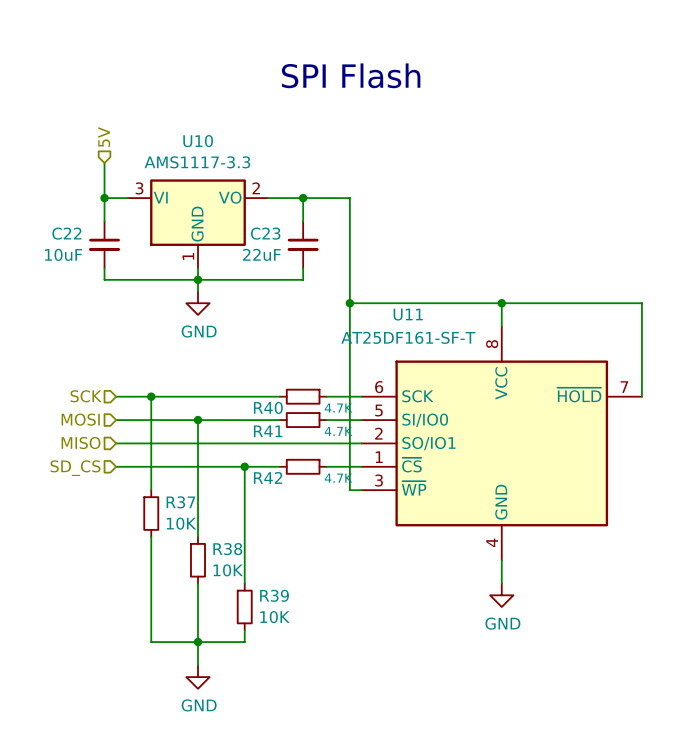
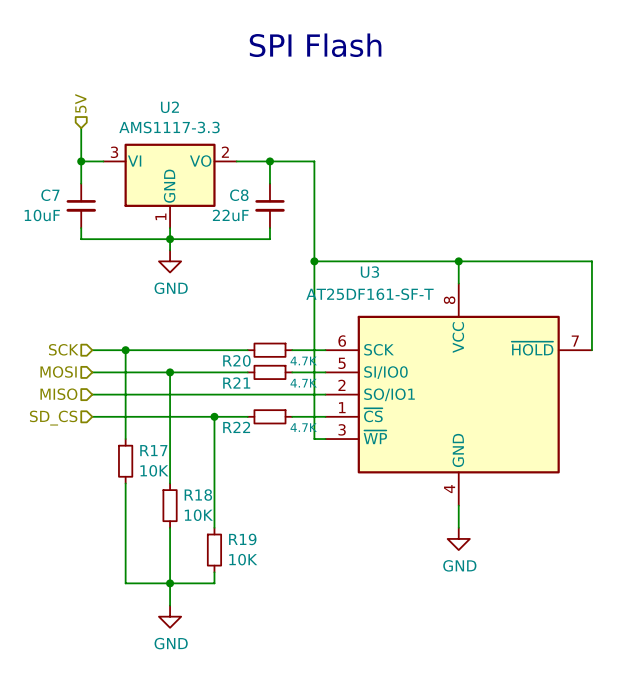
U10 name: U10 (198, 141) -> U2 (169, 107)
C22 name: C22 (66, 233) -> C7 (50, 195)
C23 name: C23 (265, 233) -> C8 (239, 195)
U11 name: U11 (408, 314) -> U3 (369, 272)
R40 name: R40 (268, 407) -> R20 (236, 360)
R41 name: R41 (268, 431) -> R21 (236, 382)
R42 name: R42 (268, 477) -> R22 (236, 427)
R37 name: R37 (180, 502) -> R17 (153, 450)
R38 name: R38 (227, 549) -> R18 (198, 495)
R39 name: R39 (274, 595) -> R19 (242, 539)

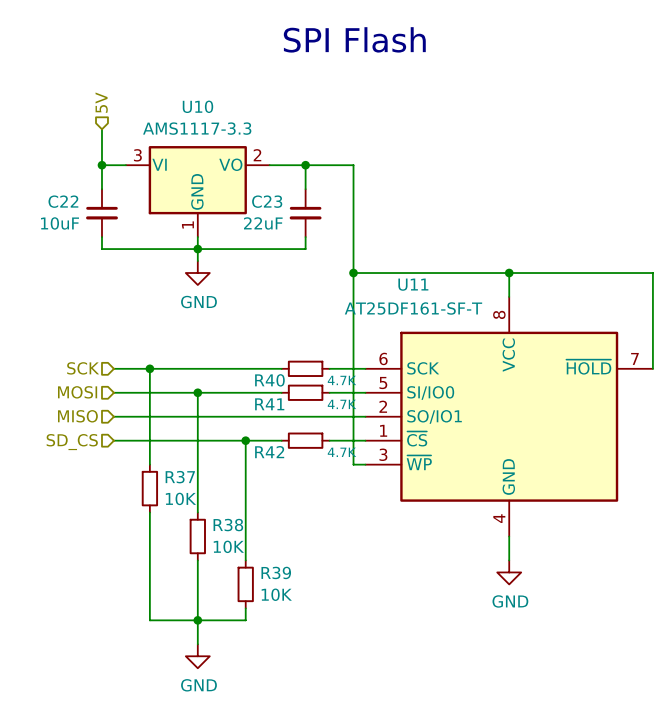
U2 name: U2 (169, 107) -> U10 (197, 106)
C7 name: C7 (50, 195) -> C22 (63, 201)
C8 name: C8 (239, 195) -> C23 (267, 201)
U3 name: U3 (369, 272) -> U11 (413, 284)
R20 name: R20 (236, 360) -> R40 (269, 380)
R21 name: R21 (236, 382) -> R41 (269, 404)
R22 name: R22 (236, 427) -> R42 (269, 452)
R17 name: R17 (153, 450) -> R37 (180, 477)
R18 name: R18 (198, 495) -> R38 (228, 525)
R19 name: R19 (242, 539) -> R39 (276, 572)

